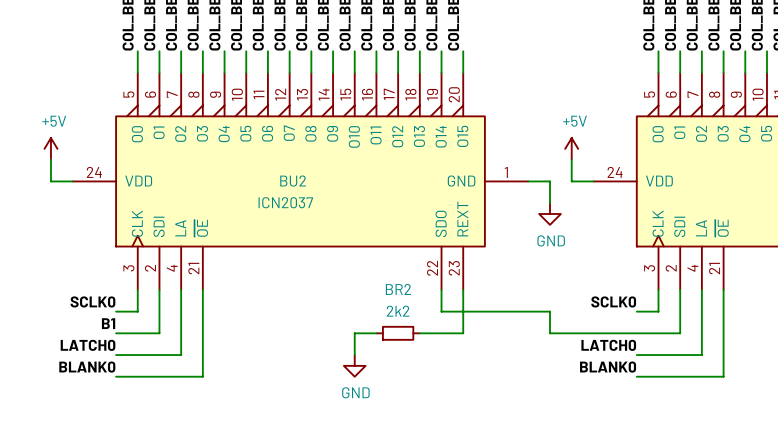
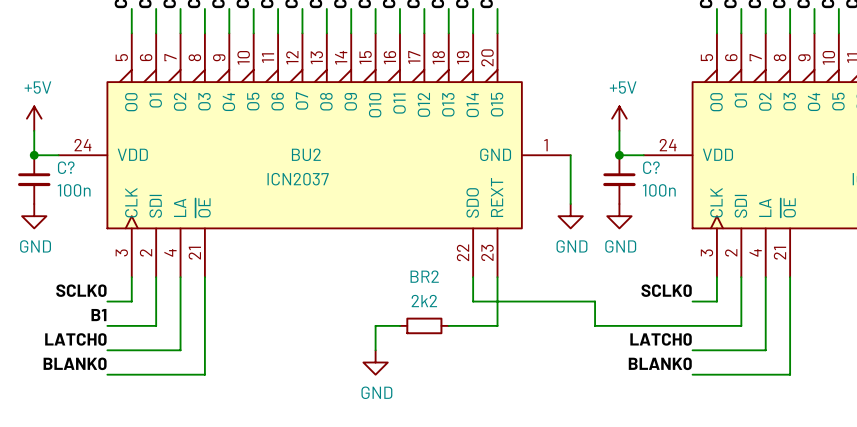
junction: none -> (34, 155)
wire: (528, 181) (550, 181) (550, 203) -> (570, 155) (570, 204)
junction: none -> (619, 155)
C?: none -> 100n (34, 179)
C?: none -> 100n (619, 179)
power symbol: GND (550, 213) -> none
power symbol: none -> GND (34, 216)
power symbol: none -> GND (570, 216)
power symbol: none -> GND (619, 216)

